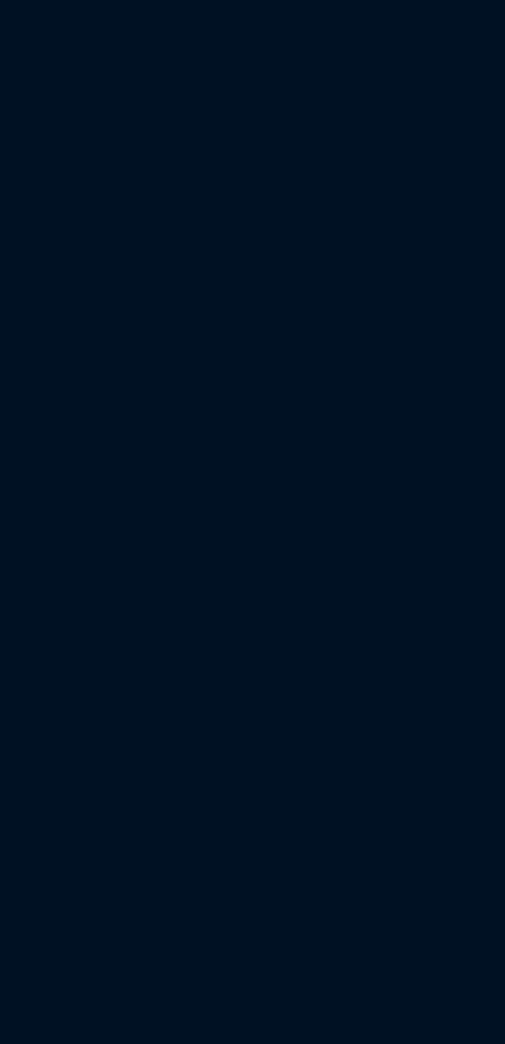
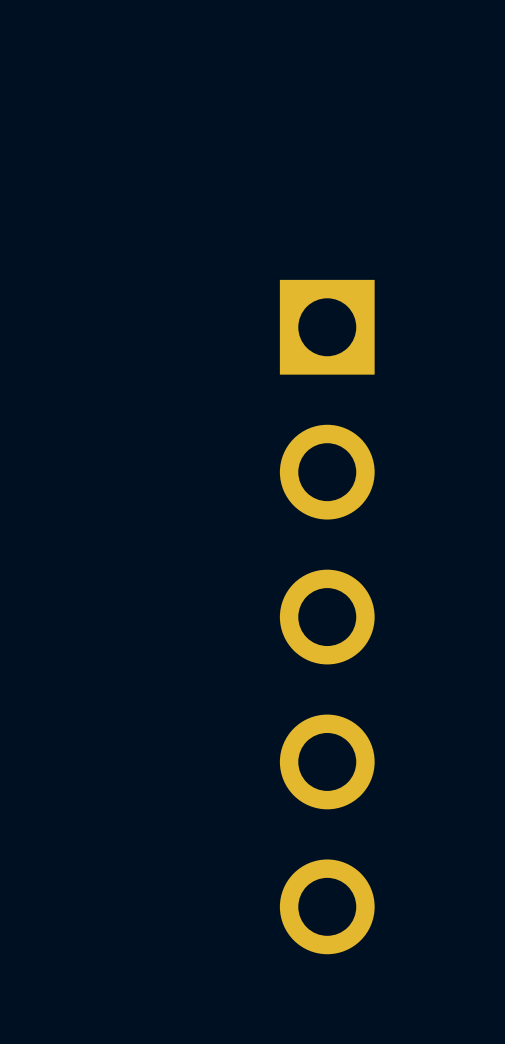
part: none -> (327, 617)

